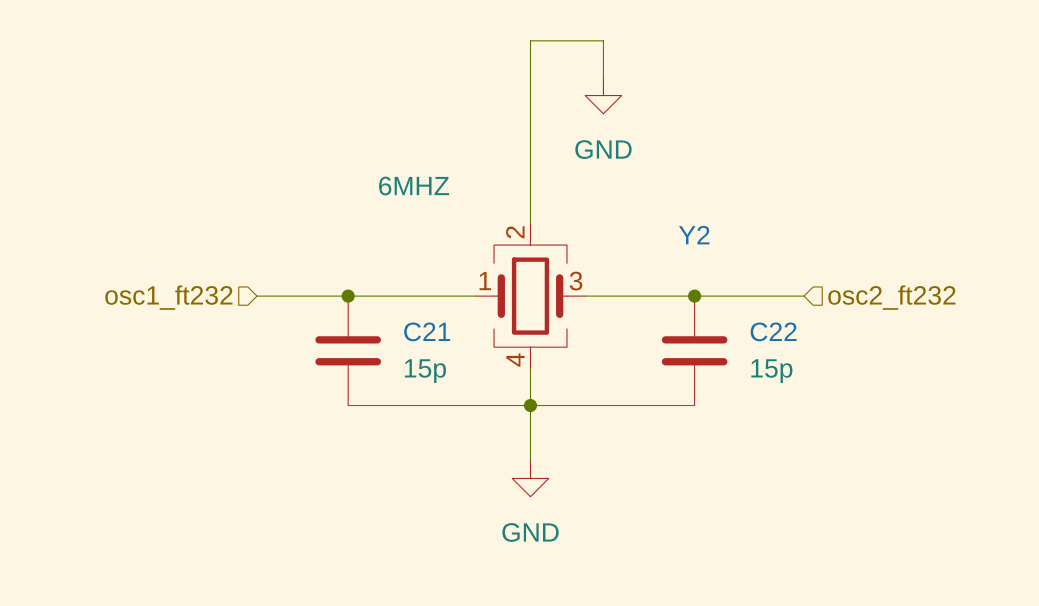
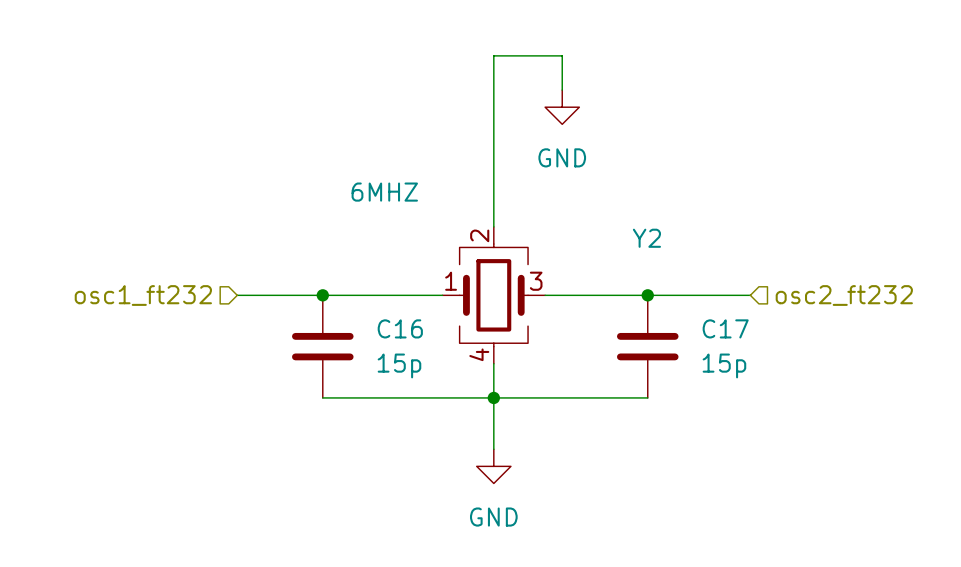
C21 name: C21 (427, 331) -> C16 (400, 328)
C22 name: C22 (773, 331) -> C17 (725, 328)

